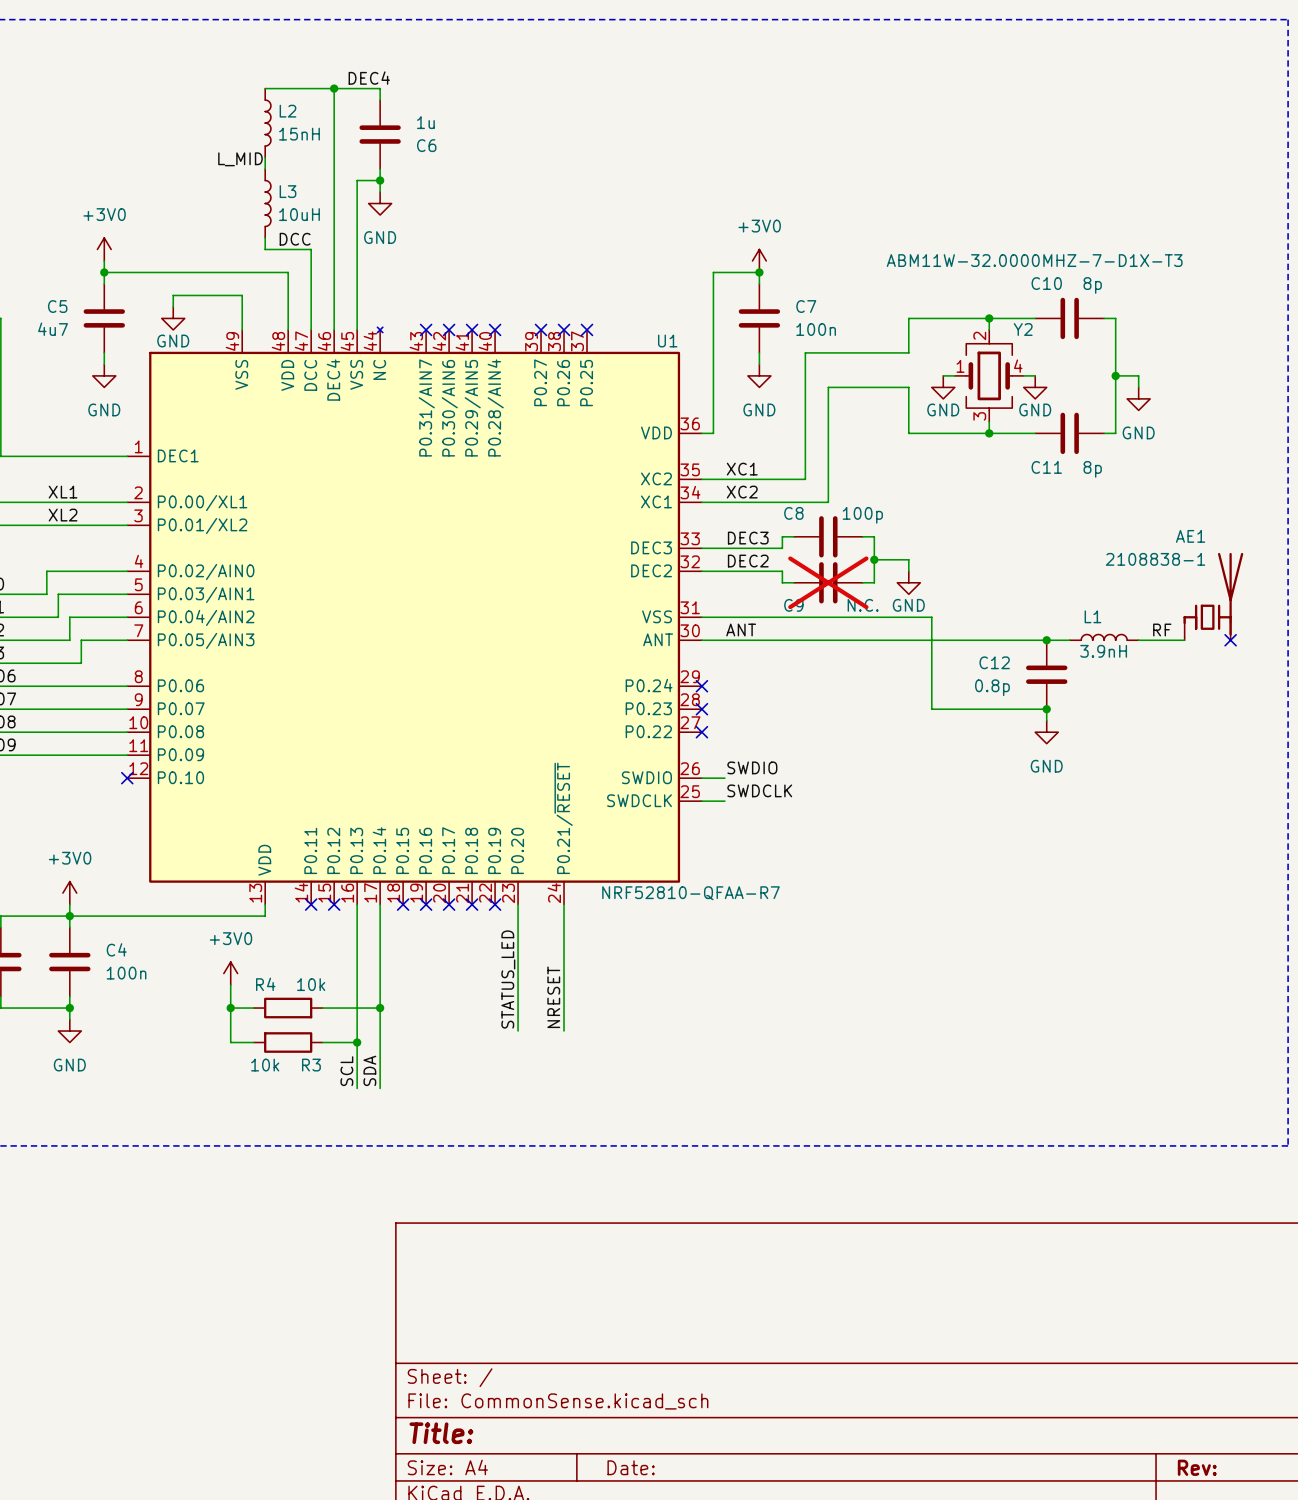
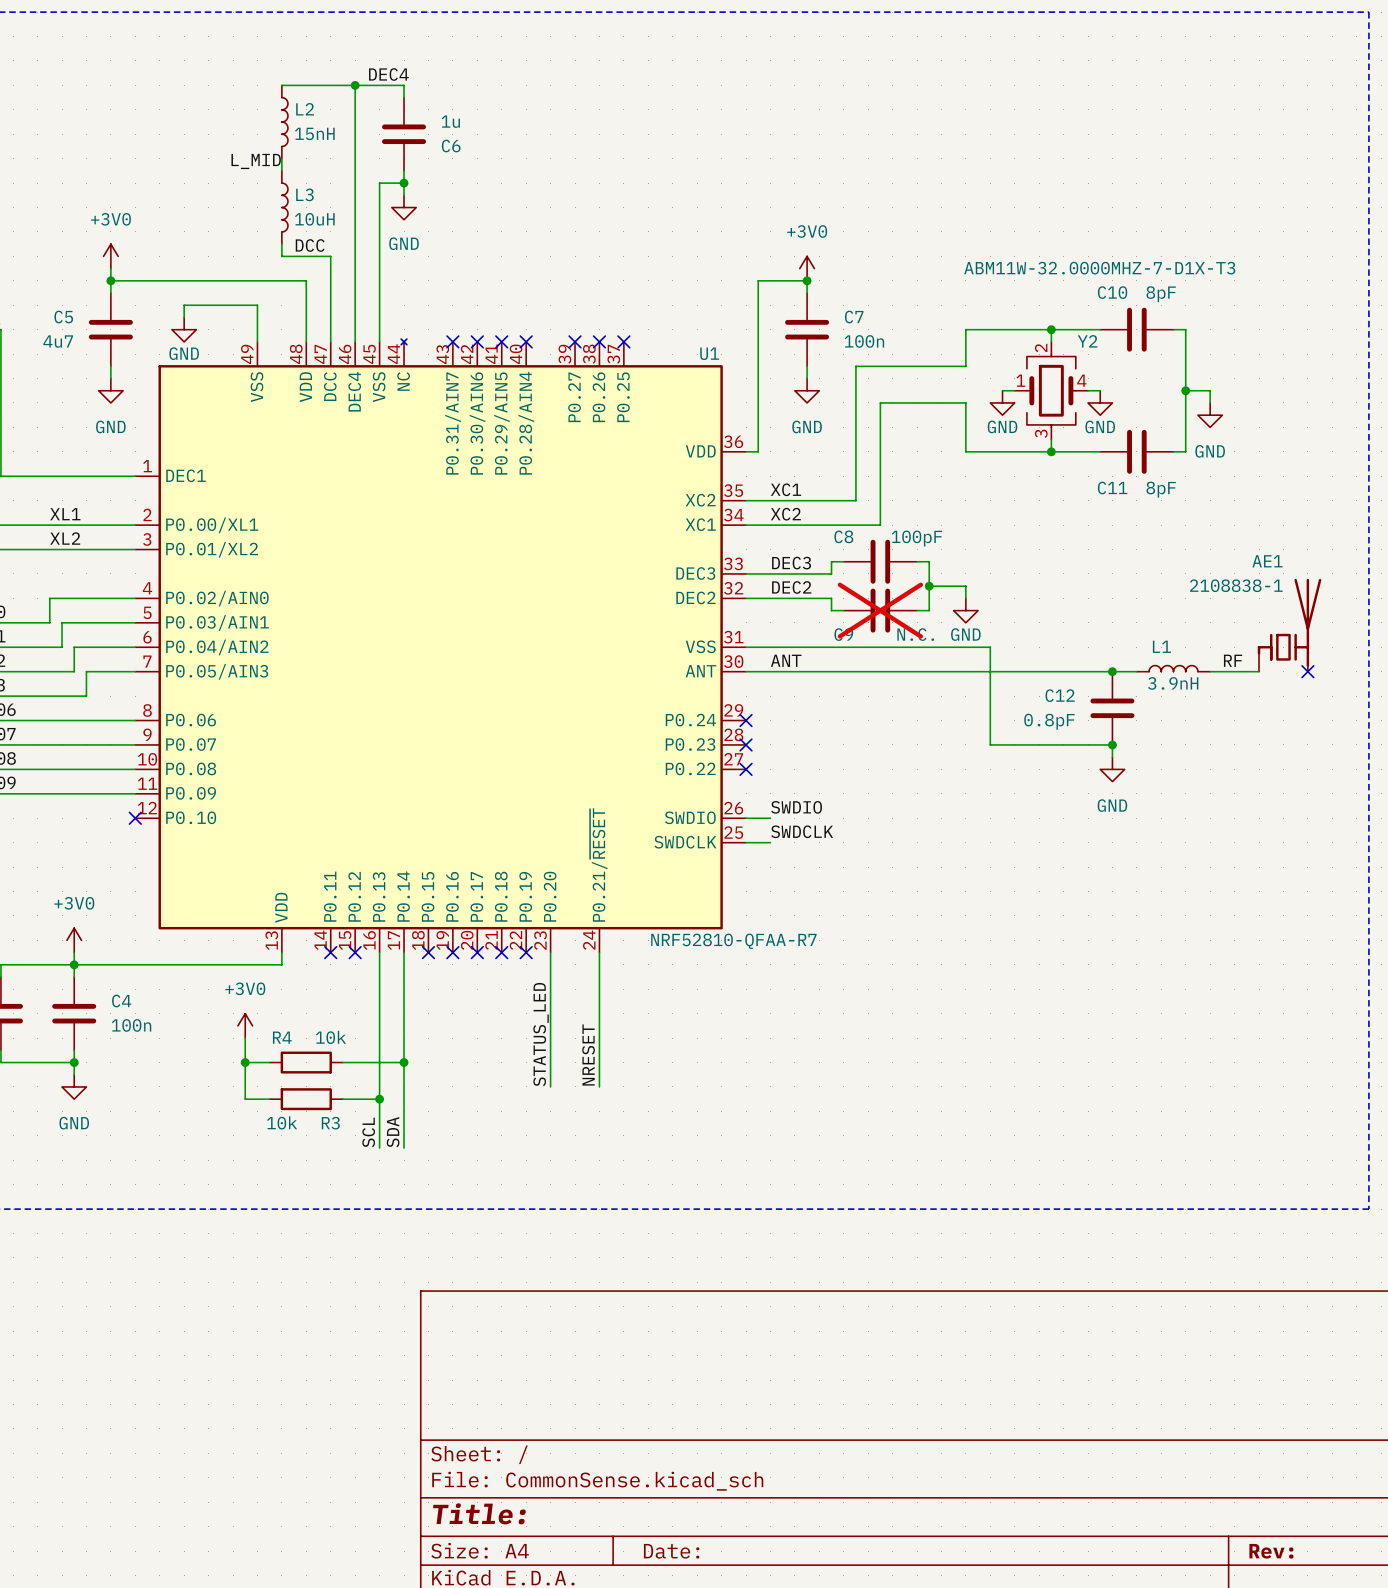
C10 value: 8p (1092, 285) -> 8pF (1161, 294)
C11 value: 8p (1092, 469) -> 8pF (1161, 489)
C8 value: 100p (862, 515) -> 100pF (916, 538)
C12 value: 0.8p (992, 687) -> 0.8pF (1049, 721)

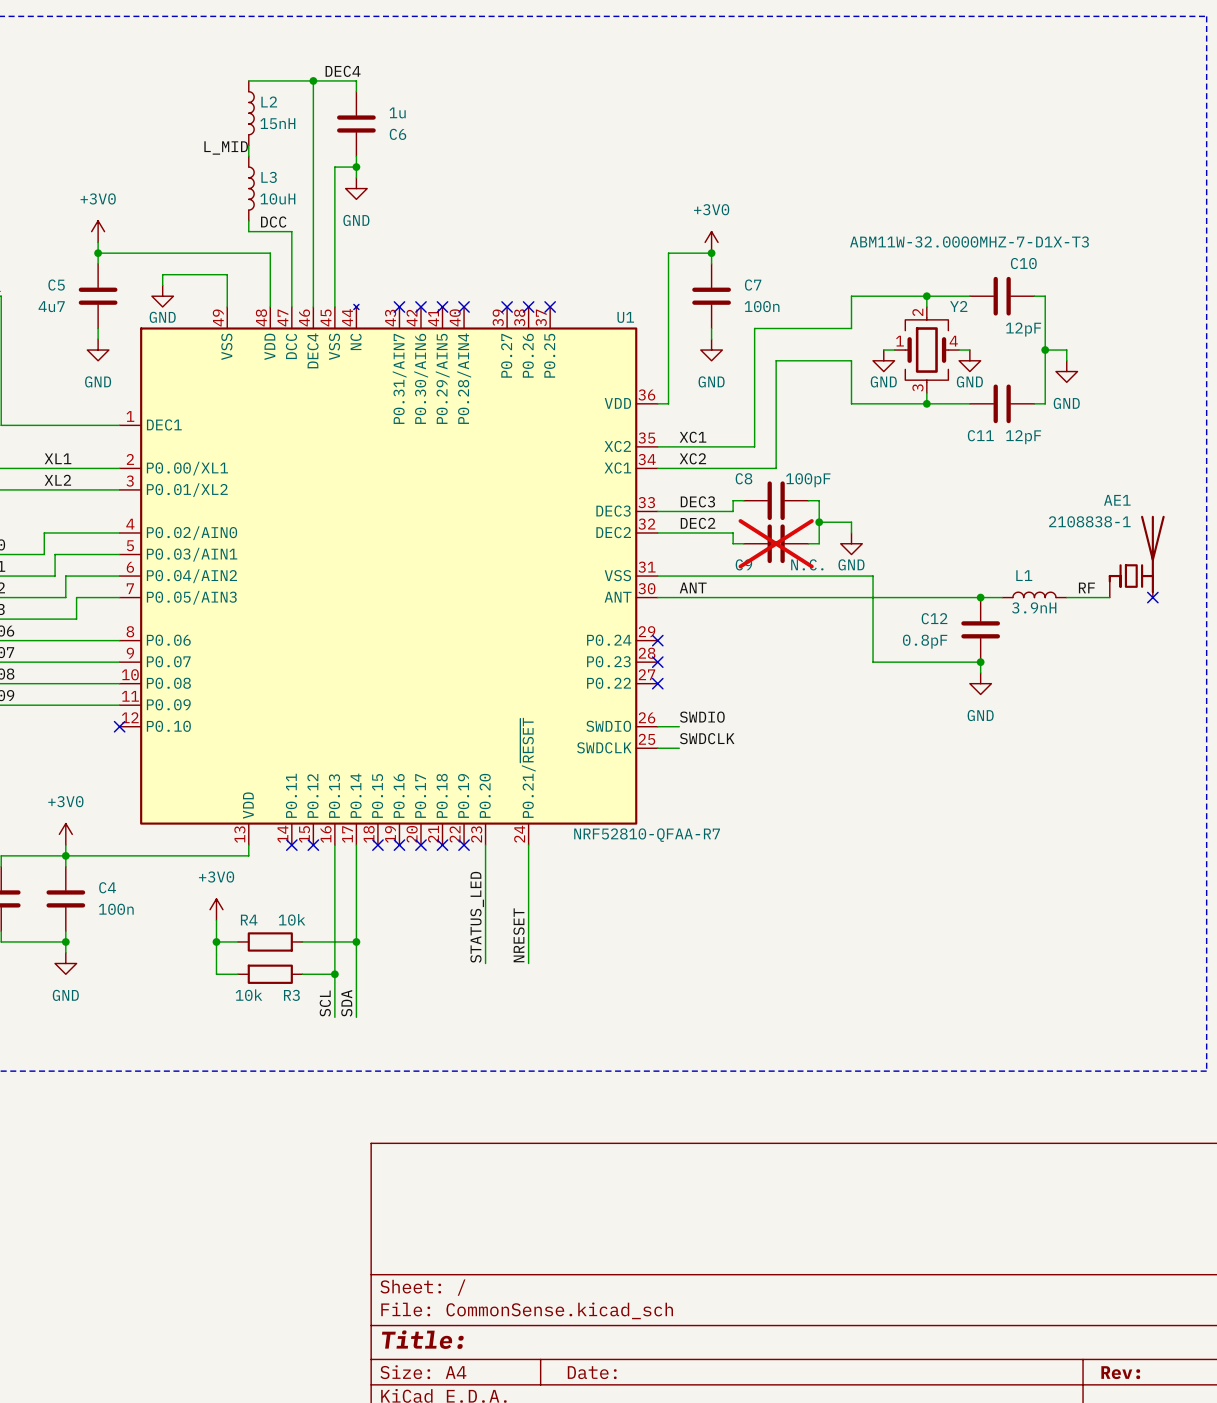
C10 name position: C10 (1112, 292) -> C10 (1023, 263)
C10 value: 8pF (1161, 294) -> 12pF (1023, 329)
C11 value: 8pF (1161, 489) -> 12pF (1023, 437)

